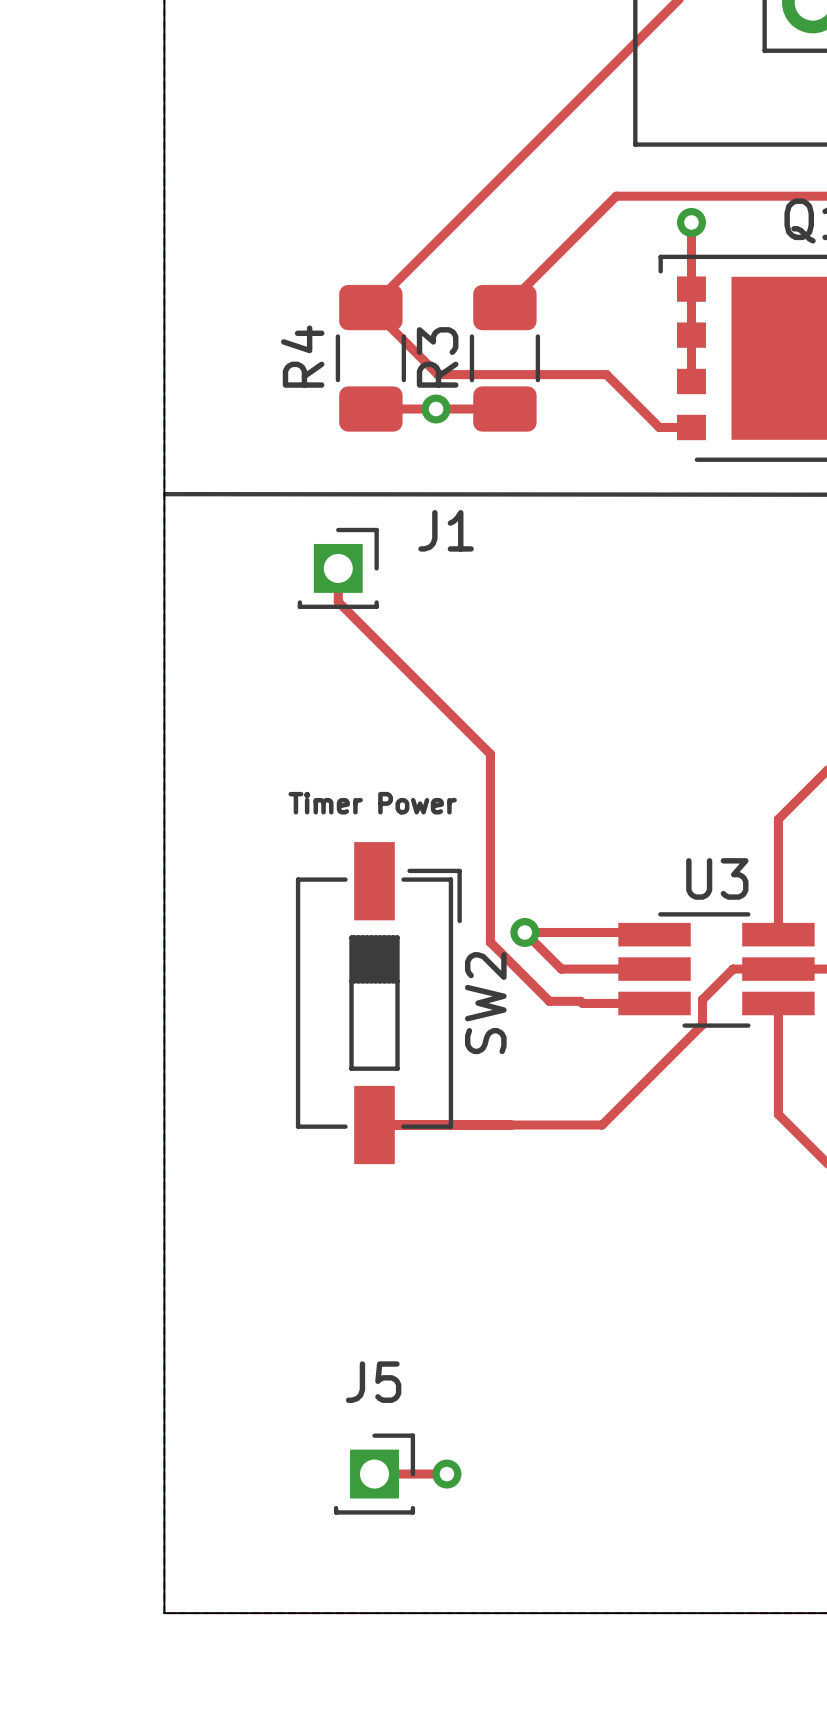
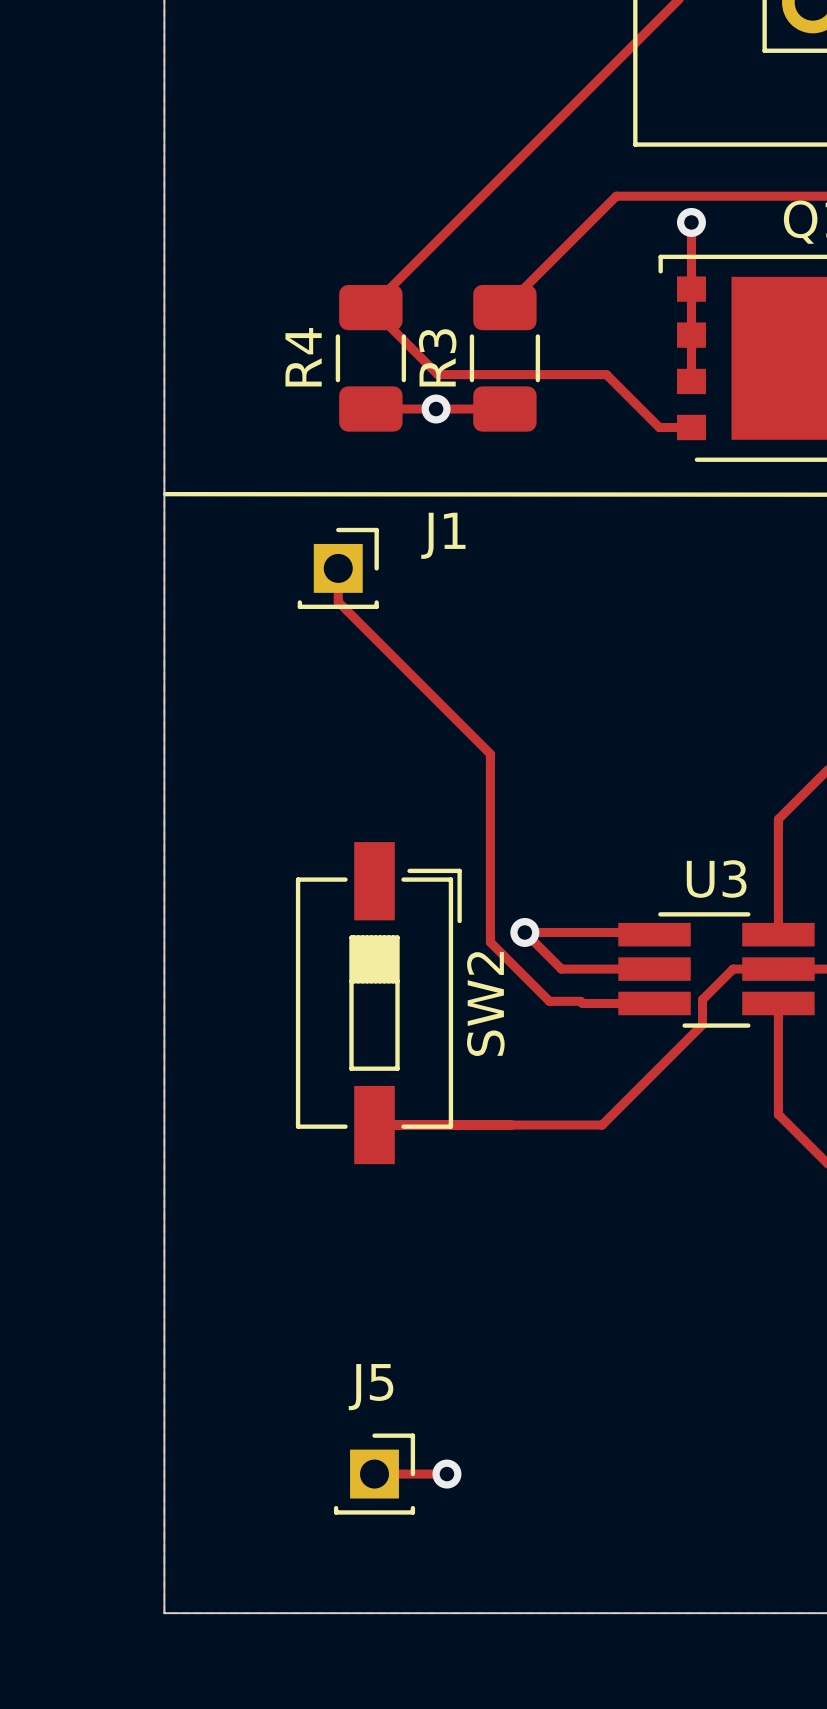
text: Timer Power (372, 803) -> none

